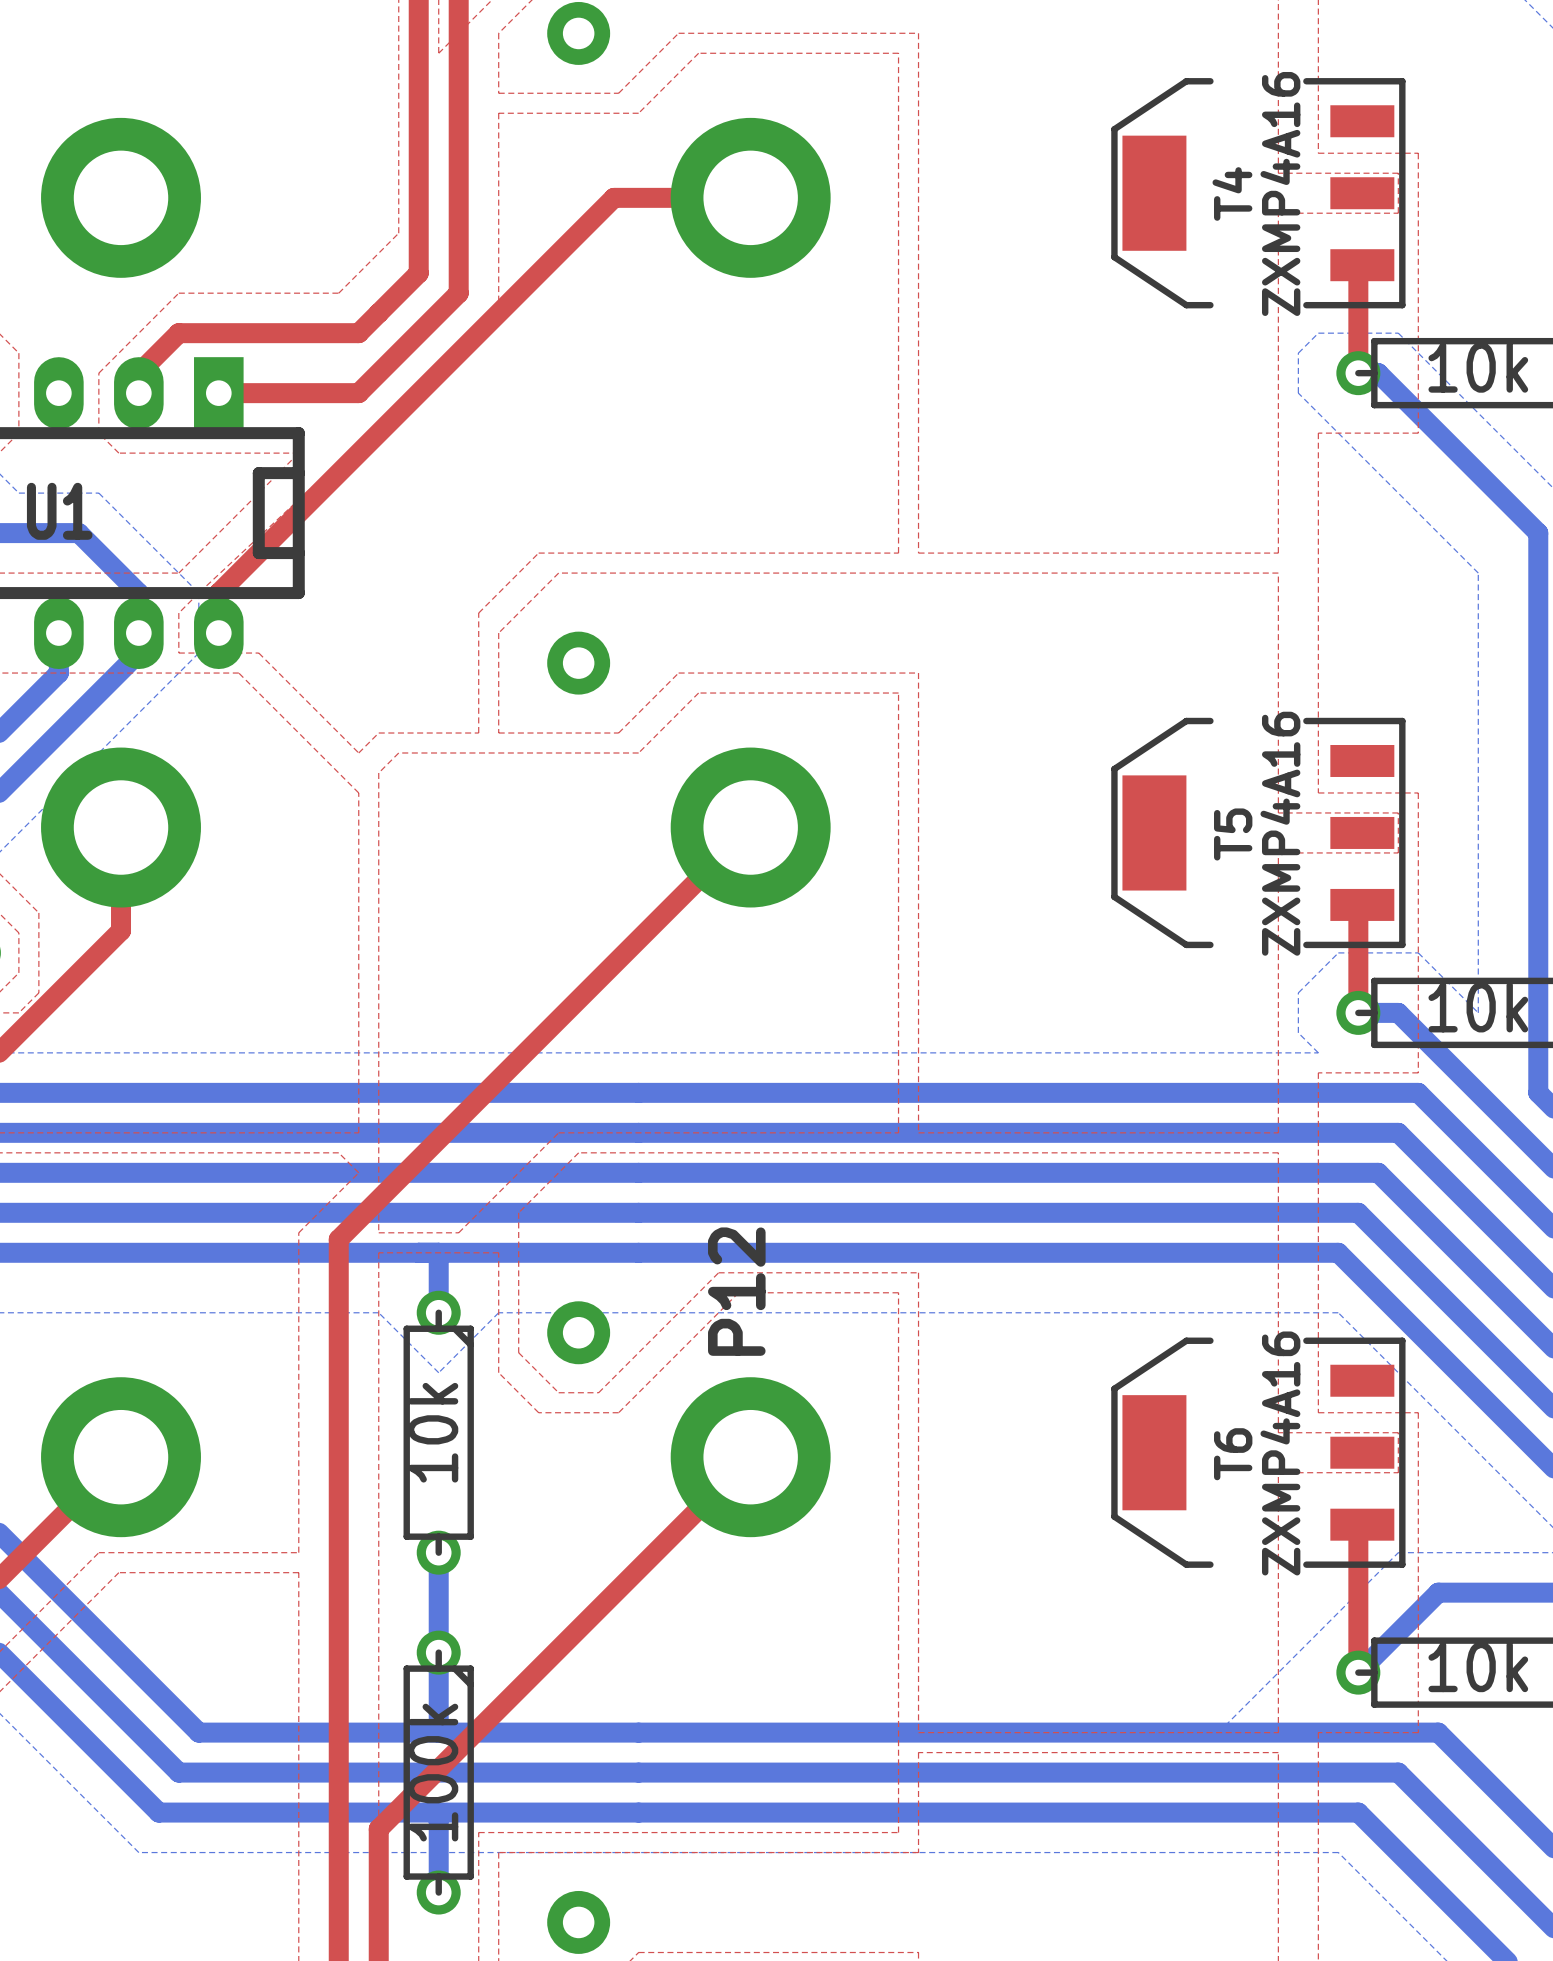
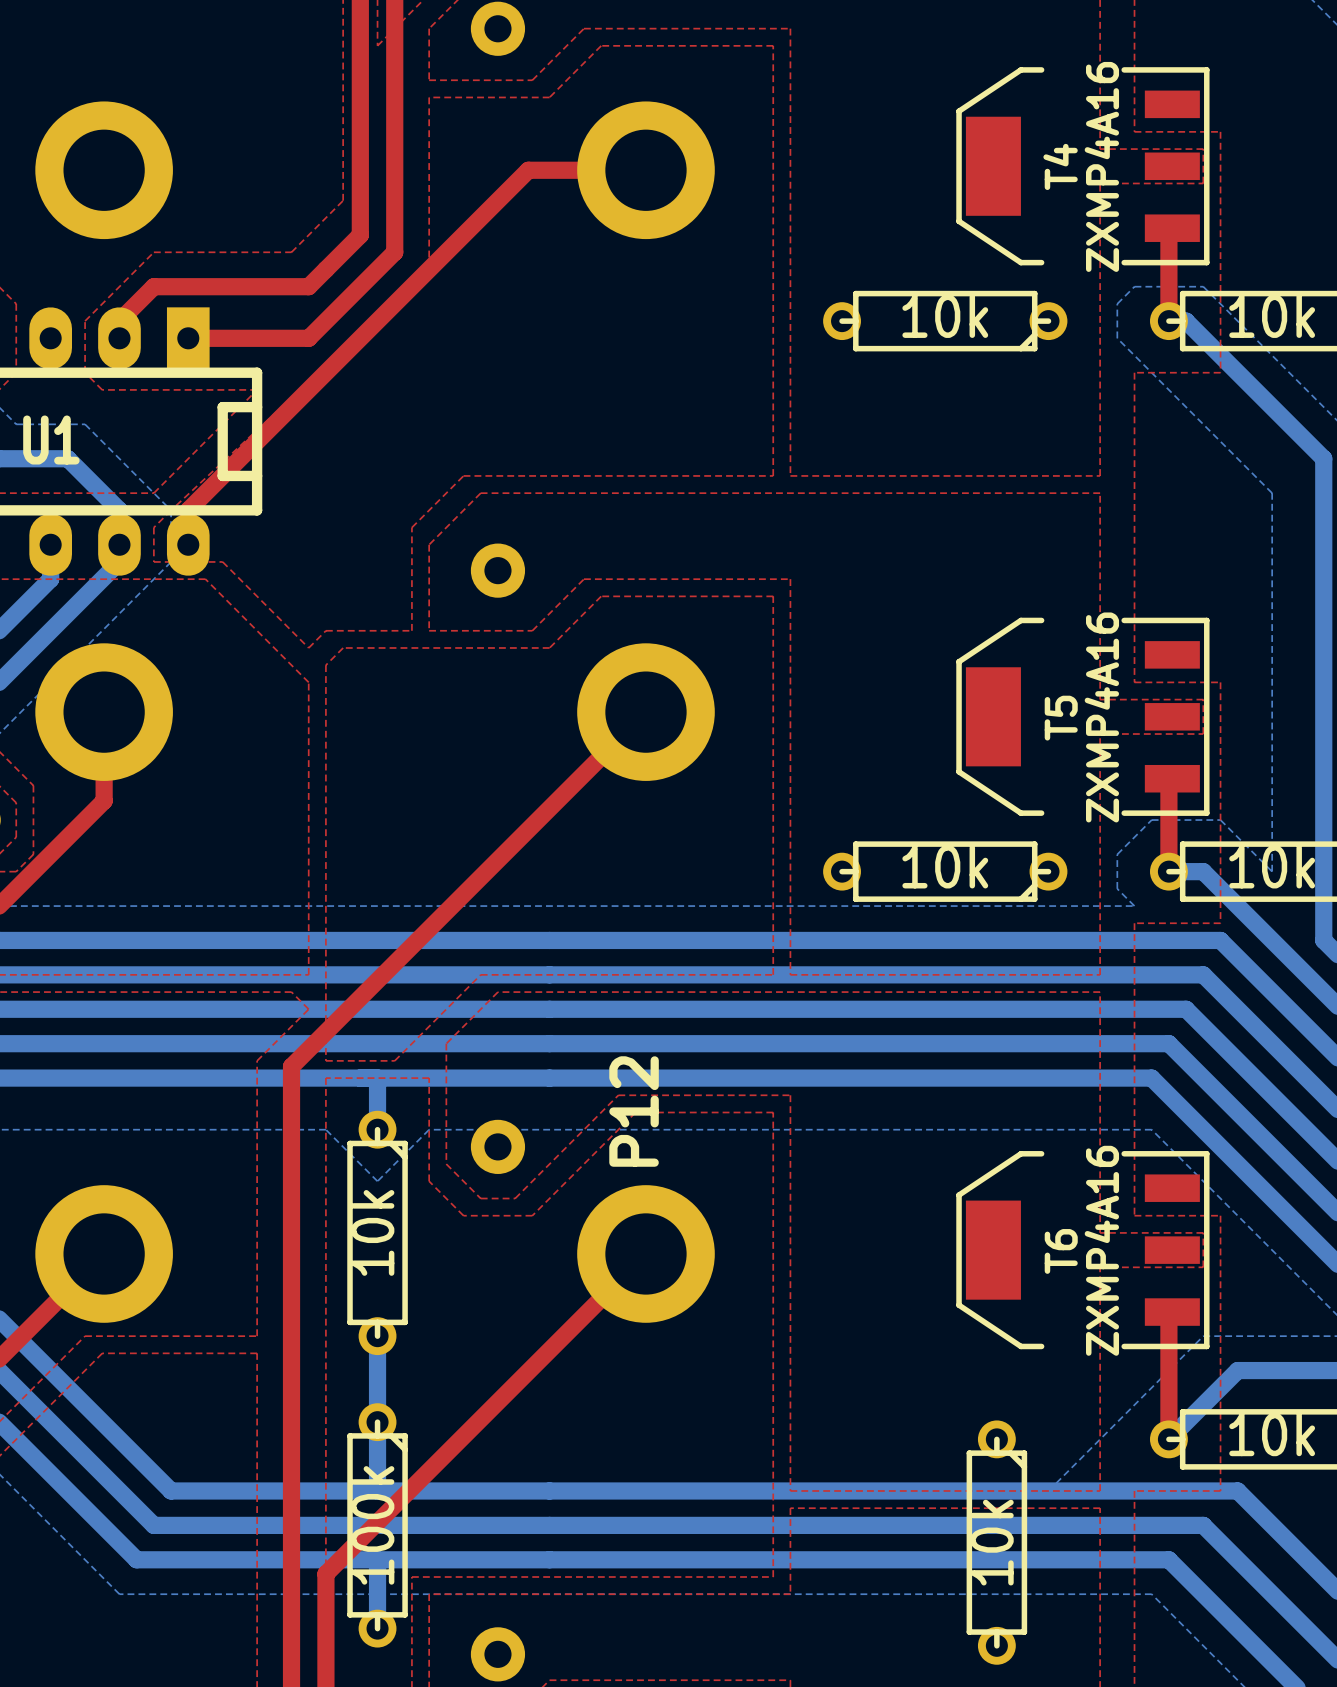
part: none -> 10k (945, 321)
part: none -> 10k (945, 871)
part: none -> 10k (996, 1542)

